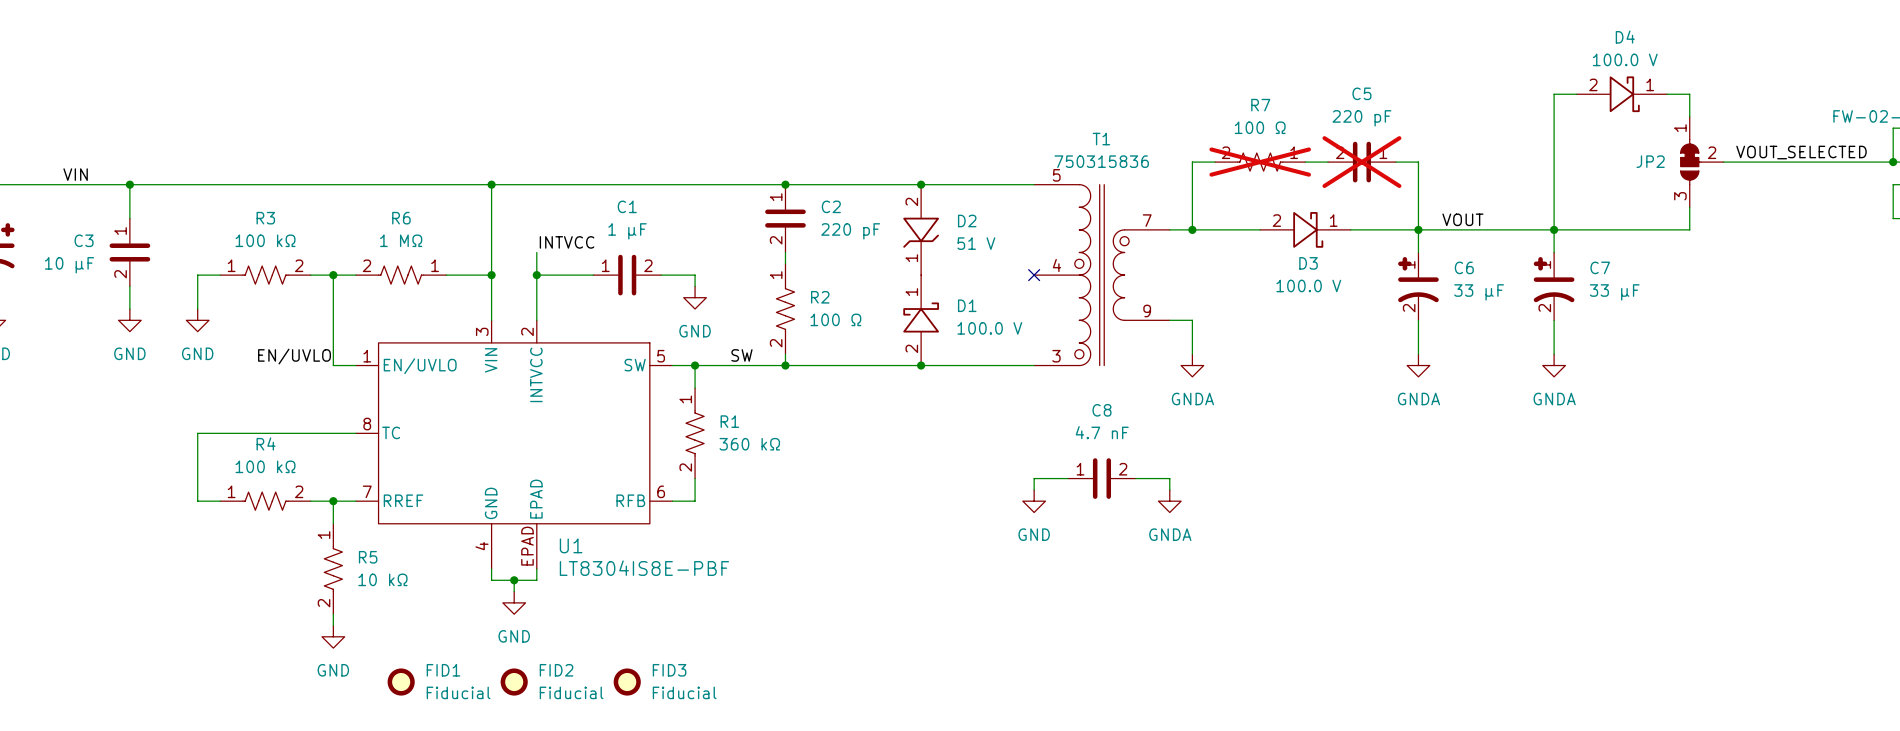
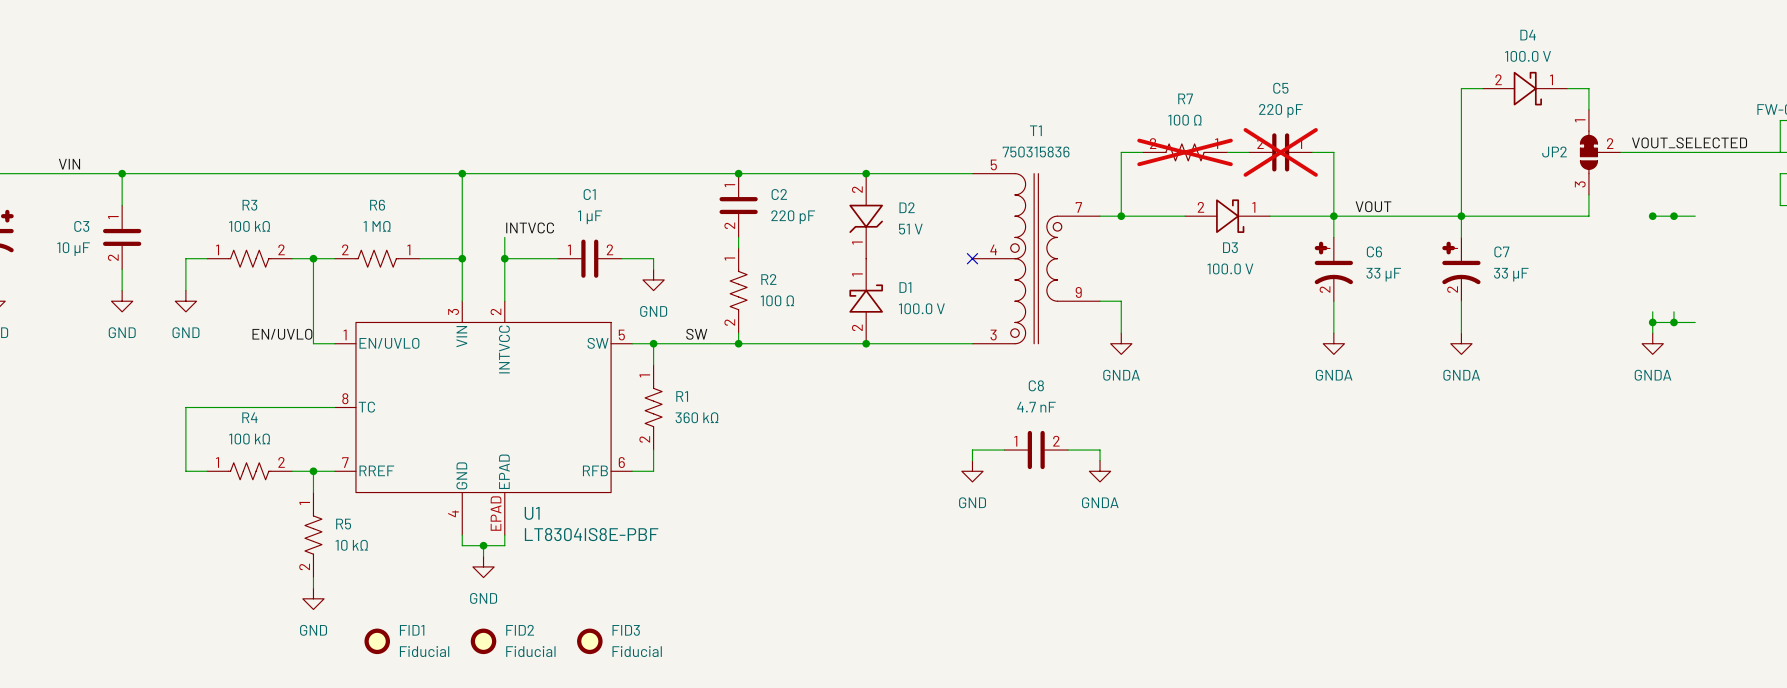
junction: (1893, 162) -> none
wire: none -> (1652, 216) (1695, 216)
junction: none -> (1652, 216)
junction: none -> (1673, 216)
wire: none -> (1652, 311) (1652, 333)
wire: none -> (1673, 311) (1673, 322)
wire: none -> (1652, 322) (1695, 322)
junction: none -> (1652, 322)
junction: none -> (1673, 322)
power symbol: none -> GNDA (1652, 343)

